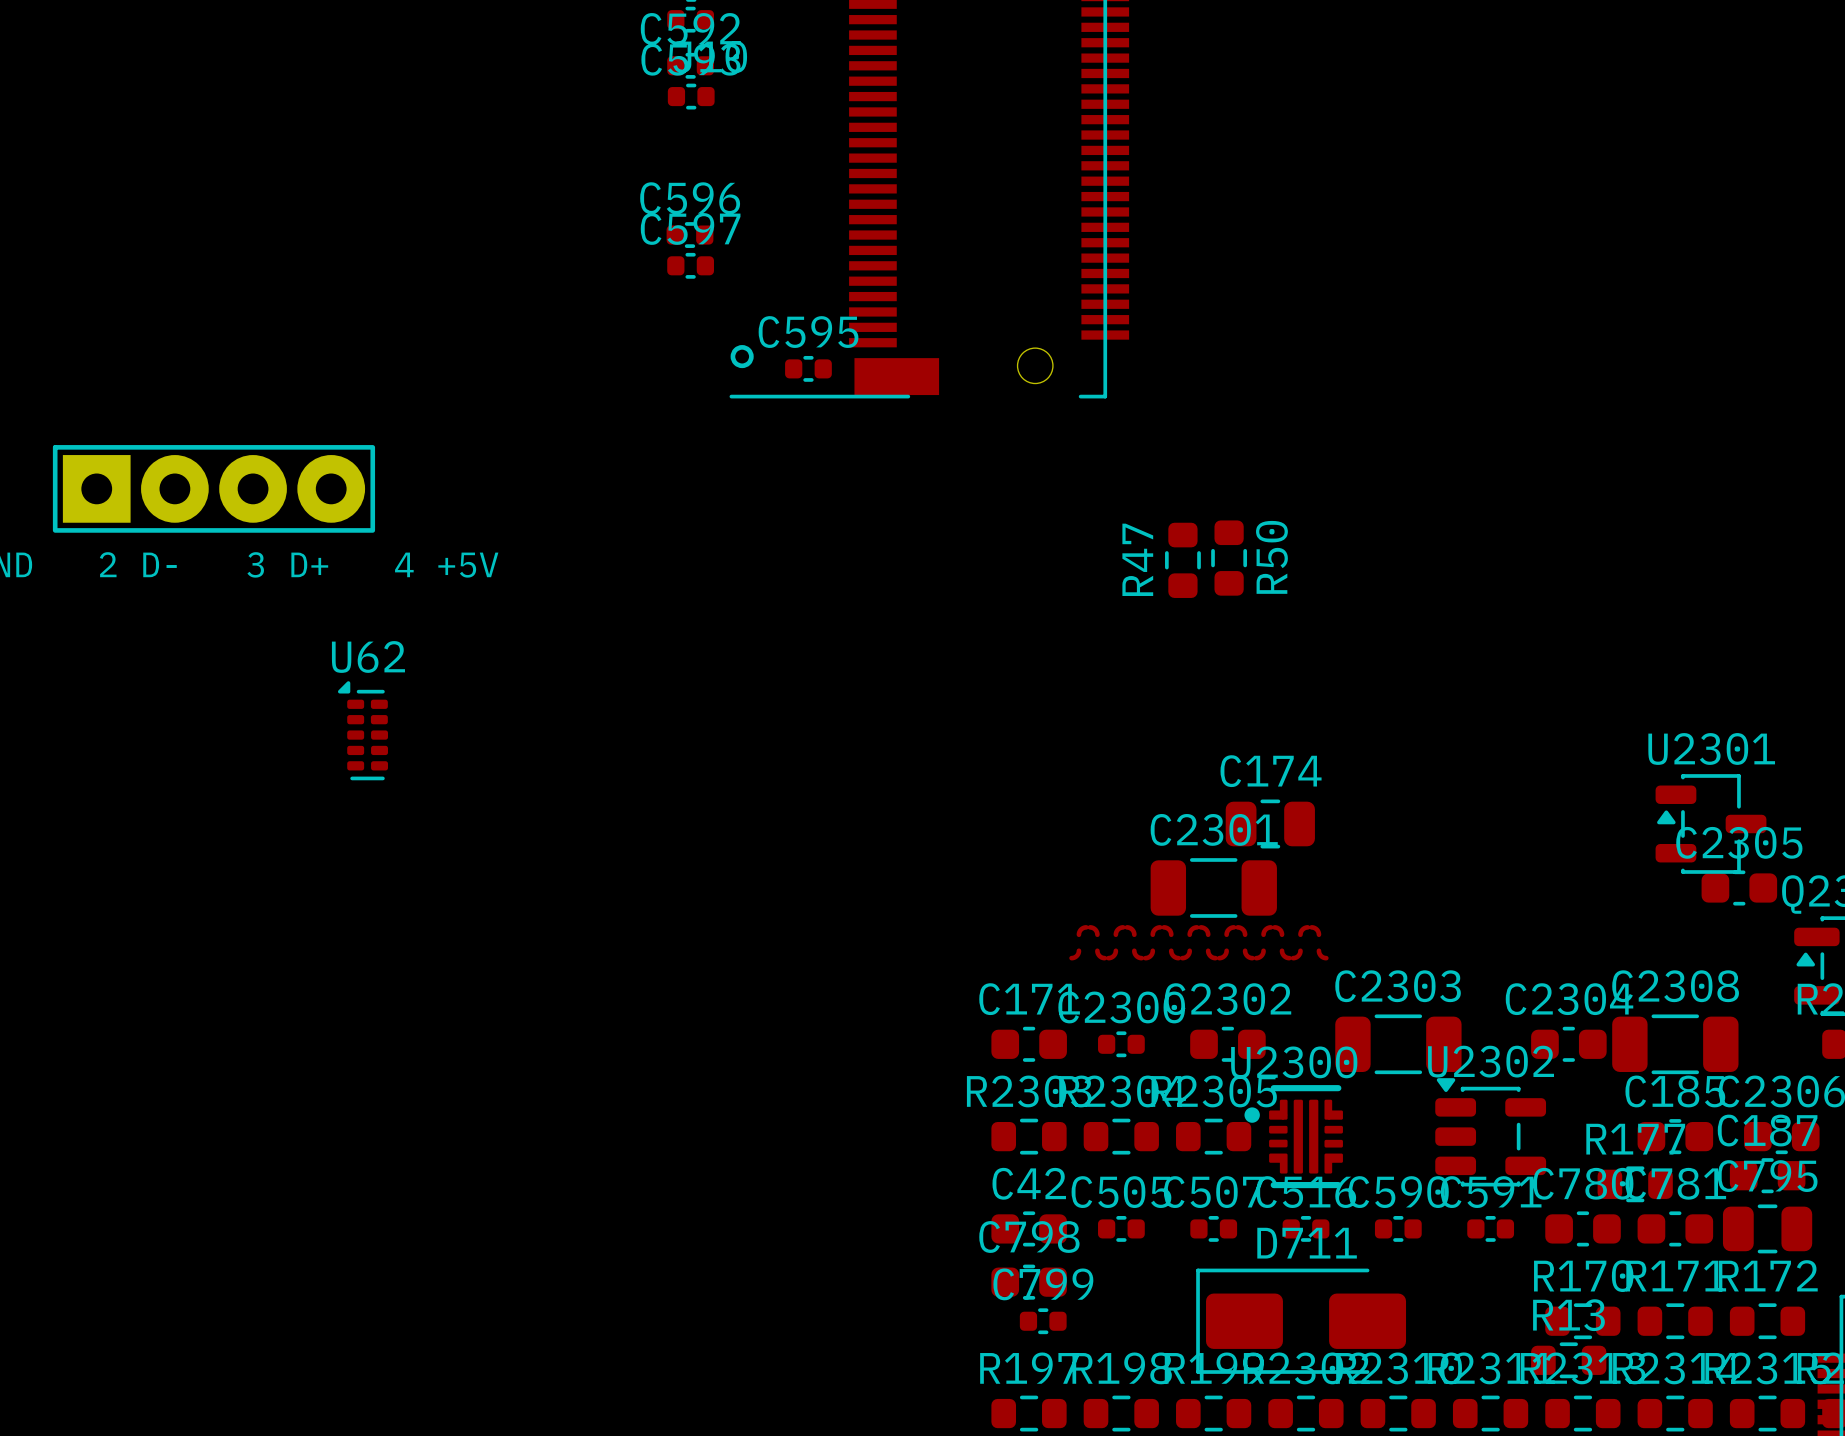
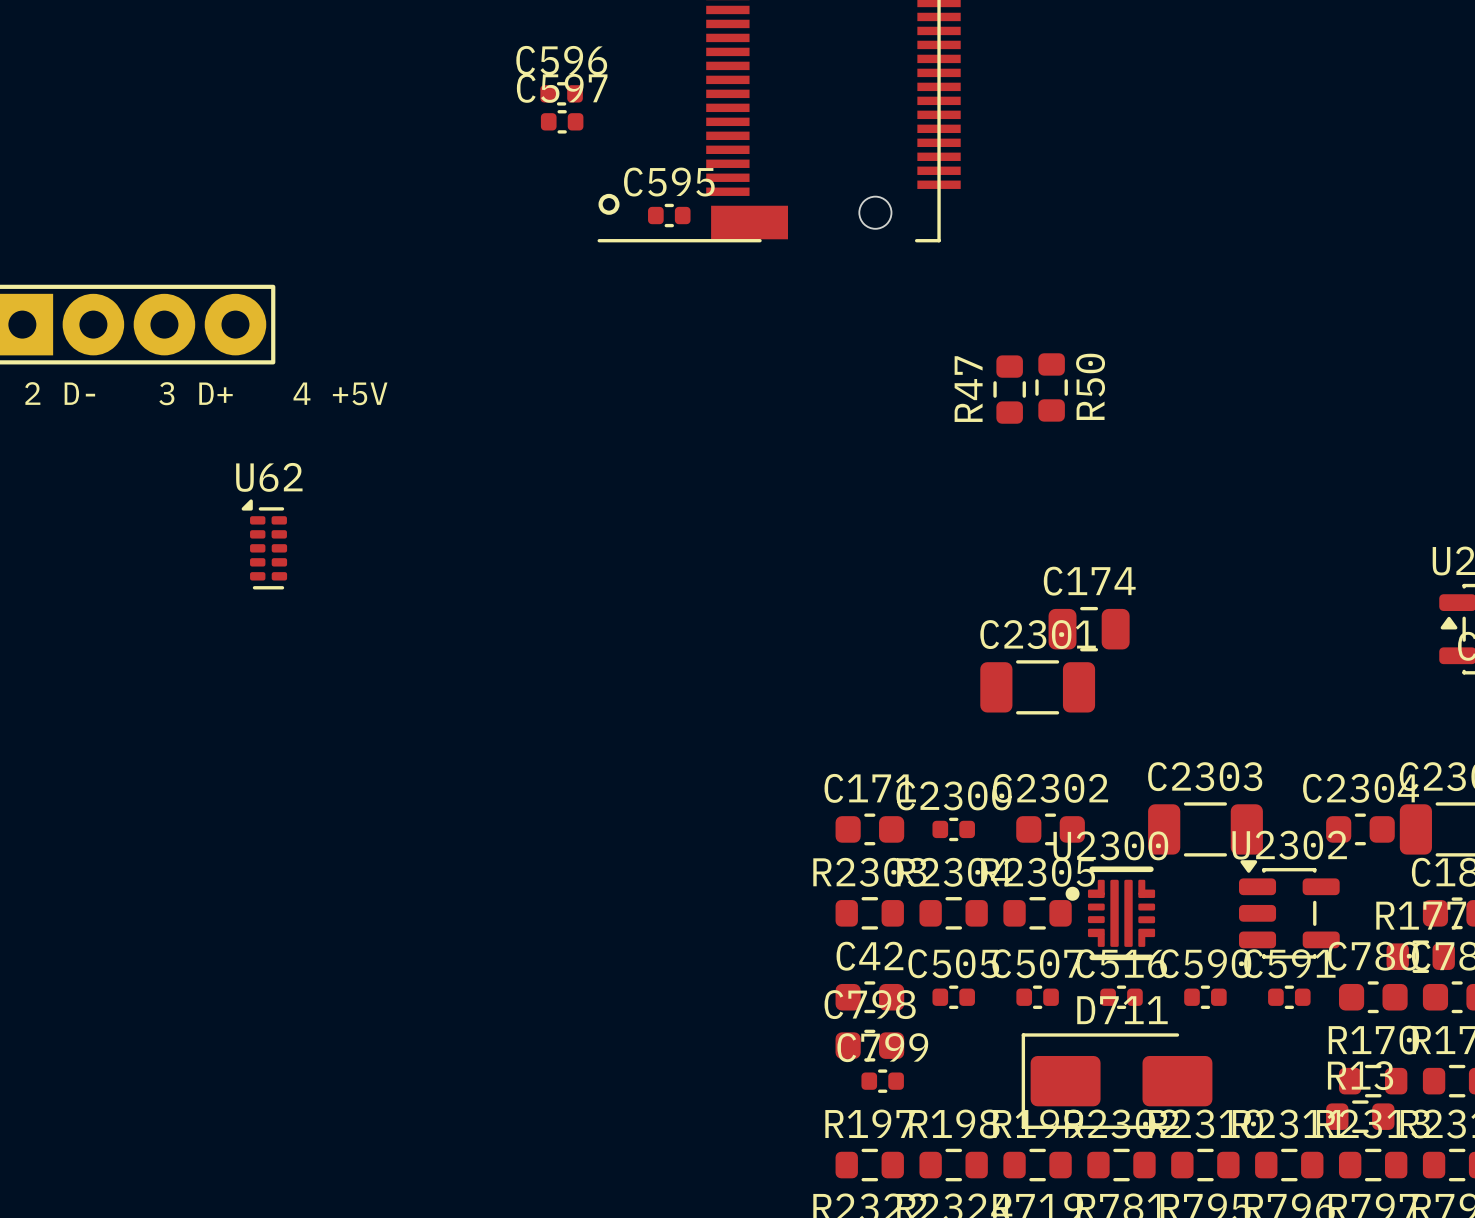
top track: (1086, 927) (1081, 929) (1078, 934) -> none
top track: (1090, 927) (1095, 929) (1097, 934) -> none
top track: (1123, 927) (1118, 929) (1115, 934) -> none
top track: (1126, 927) (1132, 929) (1134, 934) -> none
top track: (1160, 927) (1154, 929) (1152, 934) -> none
top track: (1163, 927) (1169, 929) (1171, 934) -> none
top track: (1197, 927) (1191, 929) (1189, 934) -> none
top track: (1200, 927) (1206, 929) (1208, 934) -> none
top track: (1234, 927) (1228, 929) (1226, 934) -> none
top track: (1237, 927) (1242, 929) (1245, 934) -> none
top track: (1270, 927) (1265, 929) (1263, 934) -> none
top track: (1274, 927) (1279, 929) (1282, 934) -> none
top track: (1307, 927) (1302, 929) (1300, 934) -> none
top track: (1311, 927) (1316, 929) (1318, 934) -> none
top track: (1078, 950) (1076, 955) (1071, 958) -> none
top track: (1097, 950) (1099, 955) (1104, 958) -> none
top track: (1115, 950) (1113, 955) (1108, 958) -> none
top track: (1134, 950) (1136, 955) (1141, 958) -> none
top track: (1152, 950) (1150, 955) (1145, 958) -> none
top track: (1171, 950) (1173, 955) (1178, 958) -> none
top track: (1189, 950) (1187, 955) (1182, 958) -> none
top track: (1208, 950) (1210, 955) (1215, 958) -> none
top track: (1226, 950) (1224, 955) (1219, 958) -> none
top track: (1245, 950) (1247, 955) (1252, 958) -> none
top track: (1263, 950) (1261, 955) (1256, 958) -> none
top track: (1282, 950) (1284, 955) (1289, 958) -> none
top track: (1300, 950) (1298, 955) (1293, 958) -> none
top track: (1318, 950) (1321, 955) (1326, 958) -> none

